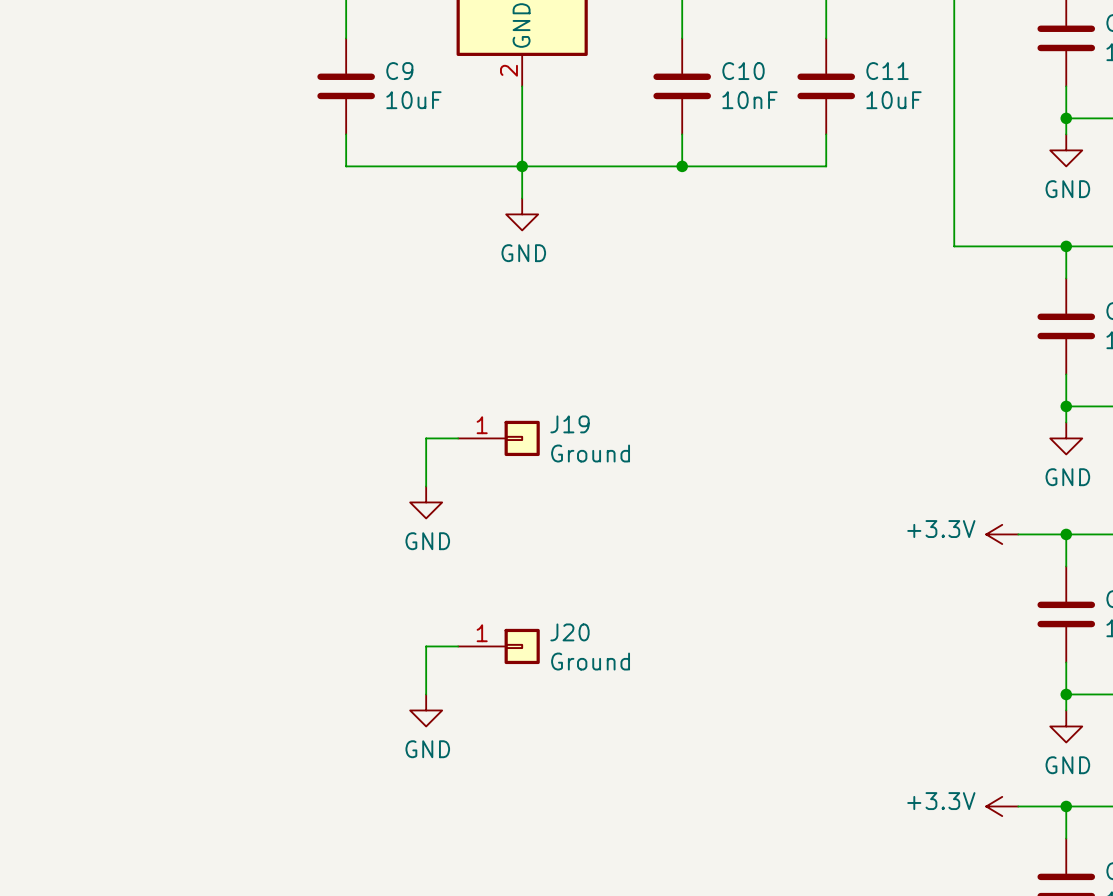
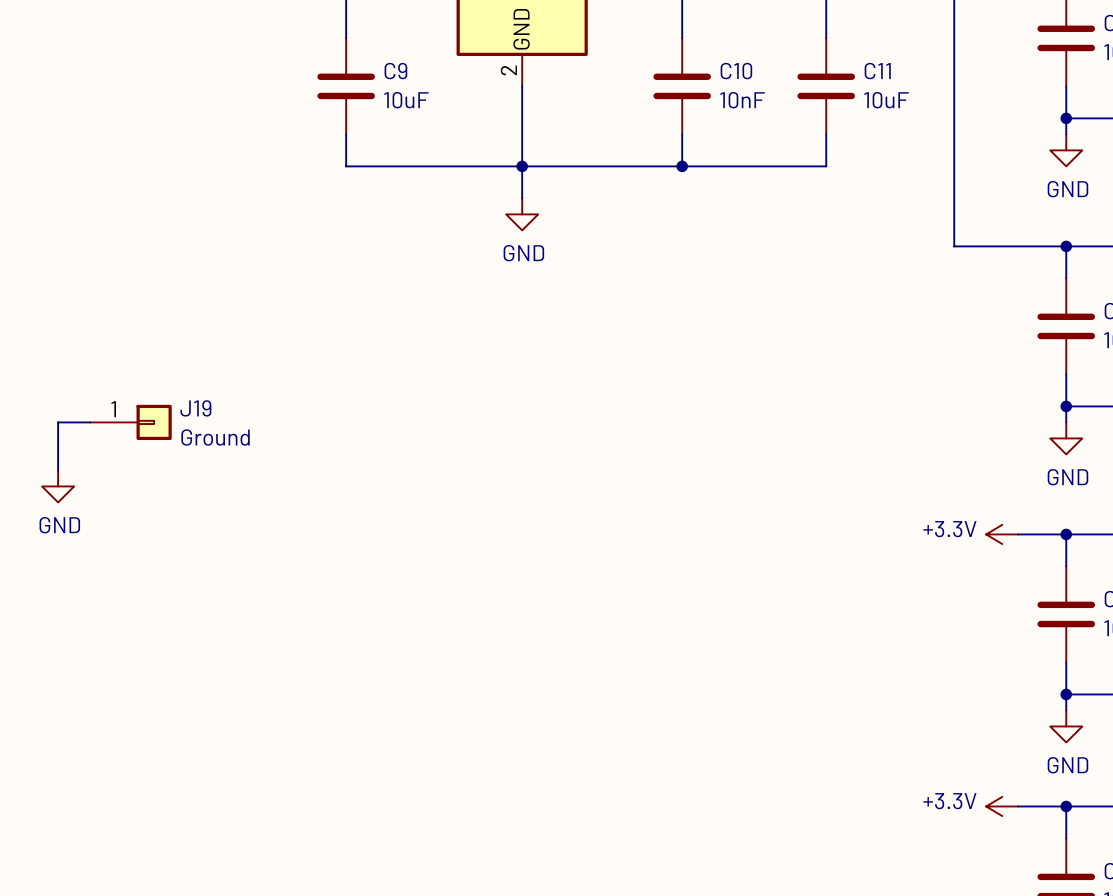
wire: none -> (90, 422) (58, 422) (58, 470)
wire: (458, 438) (426, 438) (426, 486) -> none
J19 position: (498, 438) -> (130, 422)
power symbol: none -> GND (58, 486)
power symbol: GND (426, 502) -> none
wire: (458, 646) (426, 646) (426, 694) -> none
J20: Ground (498, 646) -> none
power symbol: GND (426, 710) -> none

